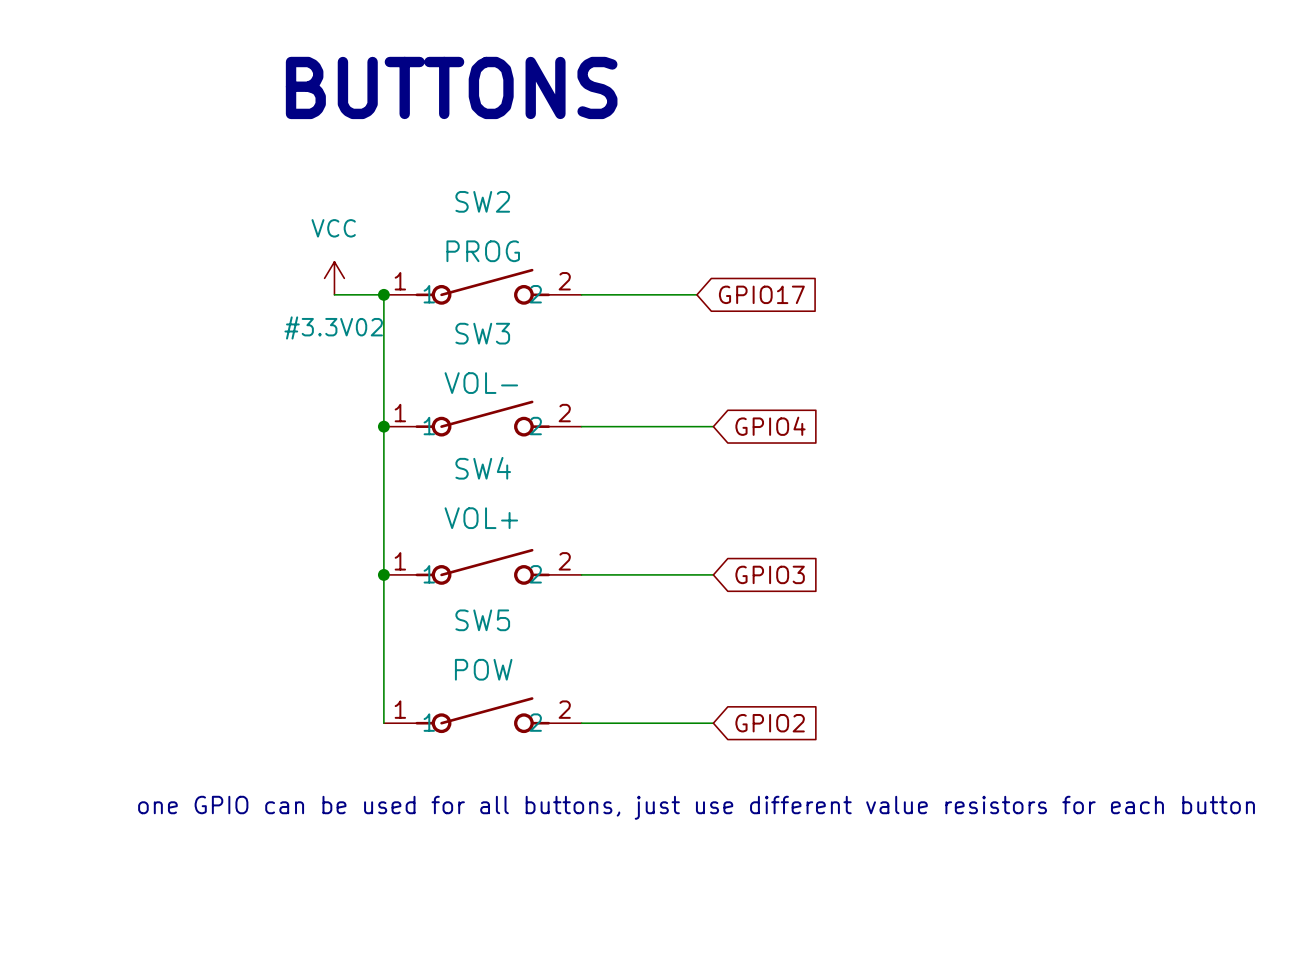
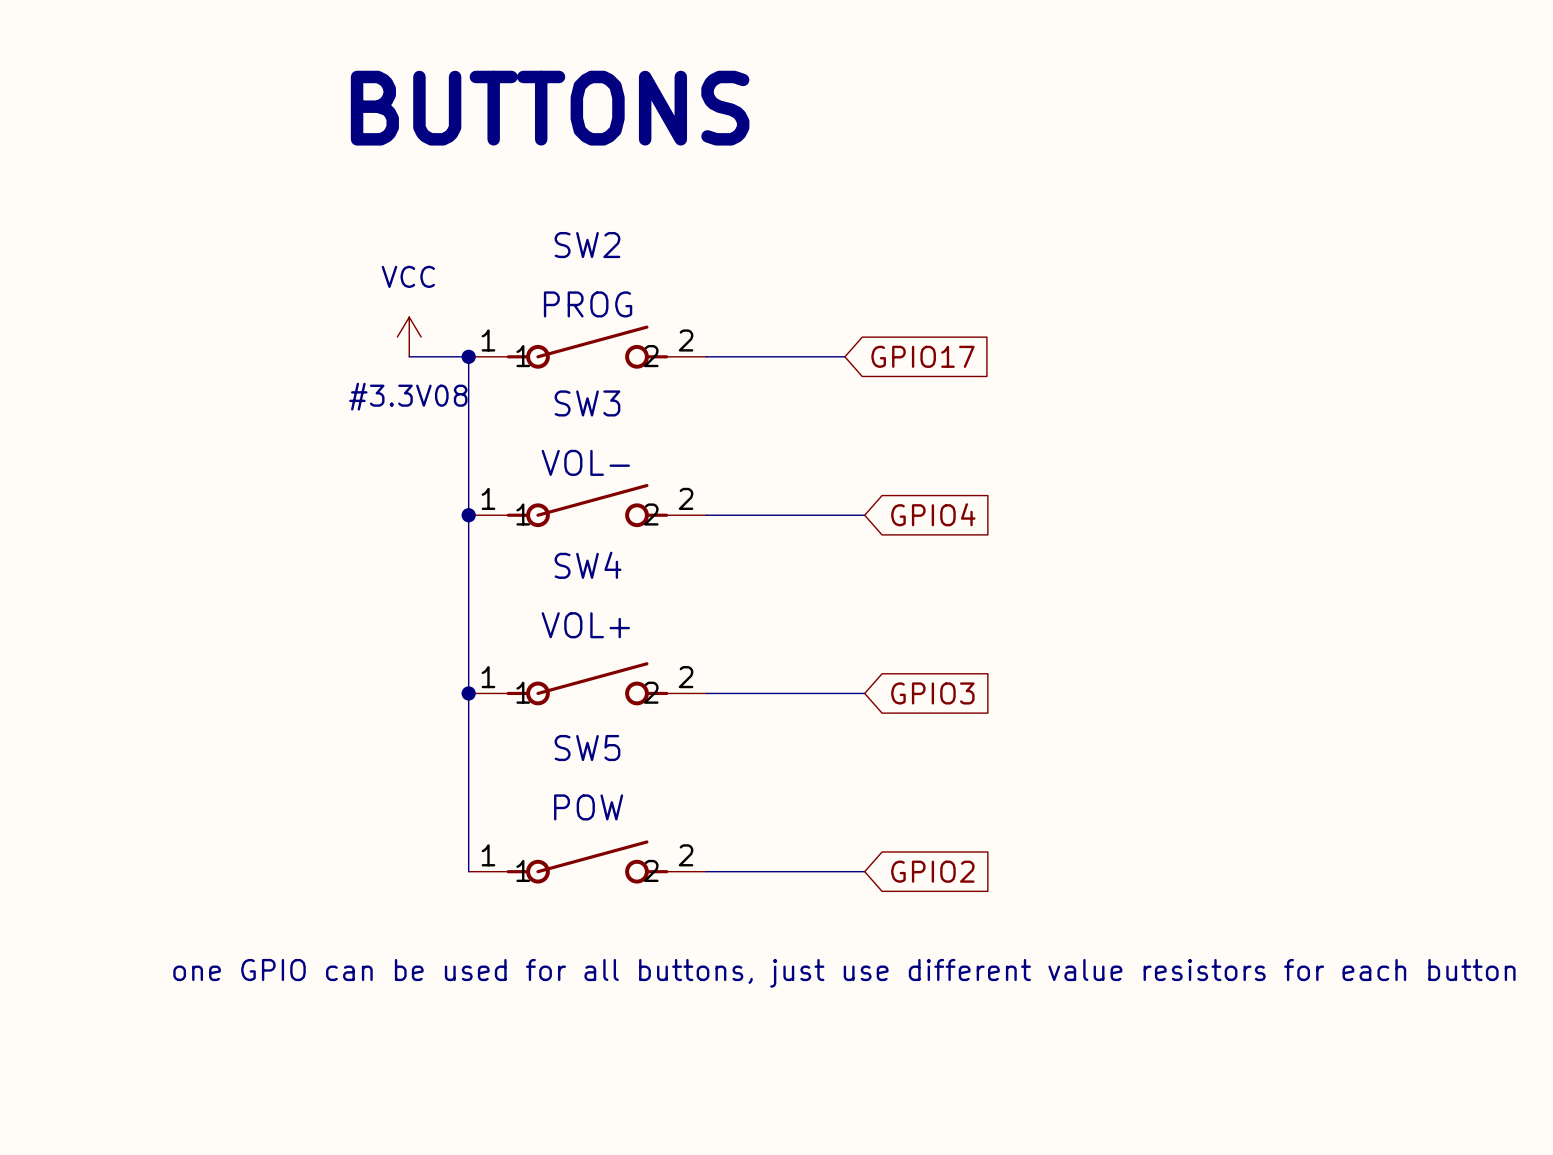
#3.3V02 name: #3.3V02 (333, 327) -> #3.3V08 (408, 396)

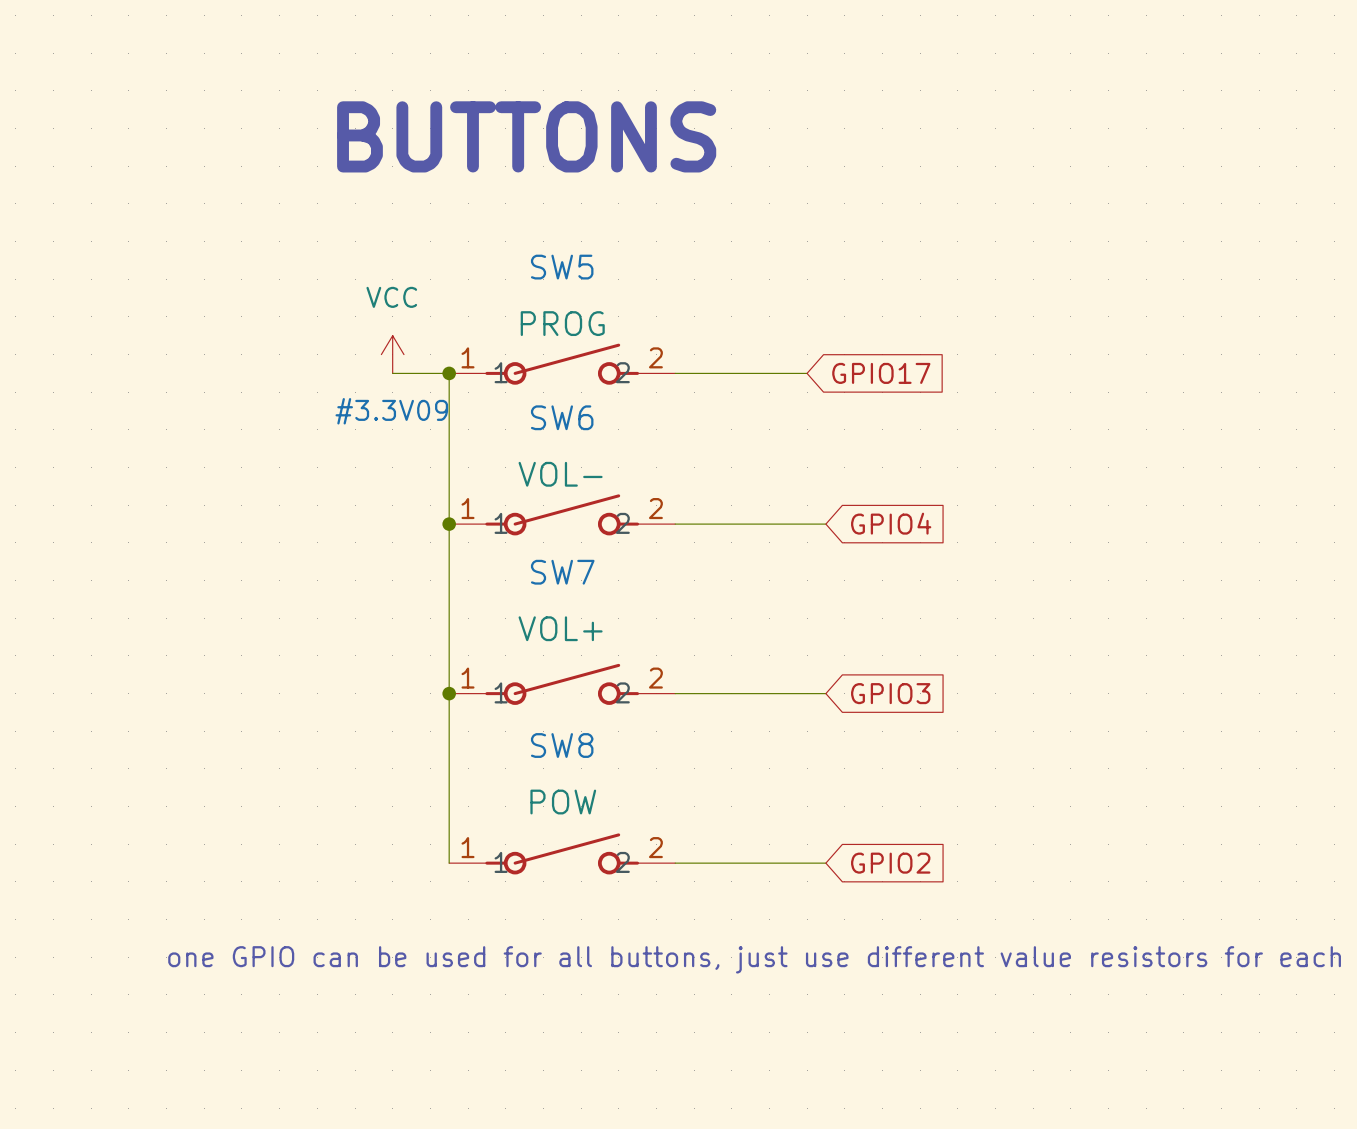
SW2 name: SW2 (587, 245) -> SW5 (562, 267)
#3.3V08 name: #3.3V08 (408, 396) -> #3.3V09 (391, 411)
SW3 name: SW3 (587, 403) -> SW6 (562, 417)
SW4 name: SW4 (588, 565) -> SW7 (562, 572)
SW5 name: SW5 (587, 748) -> SW8 (562, 745)

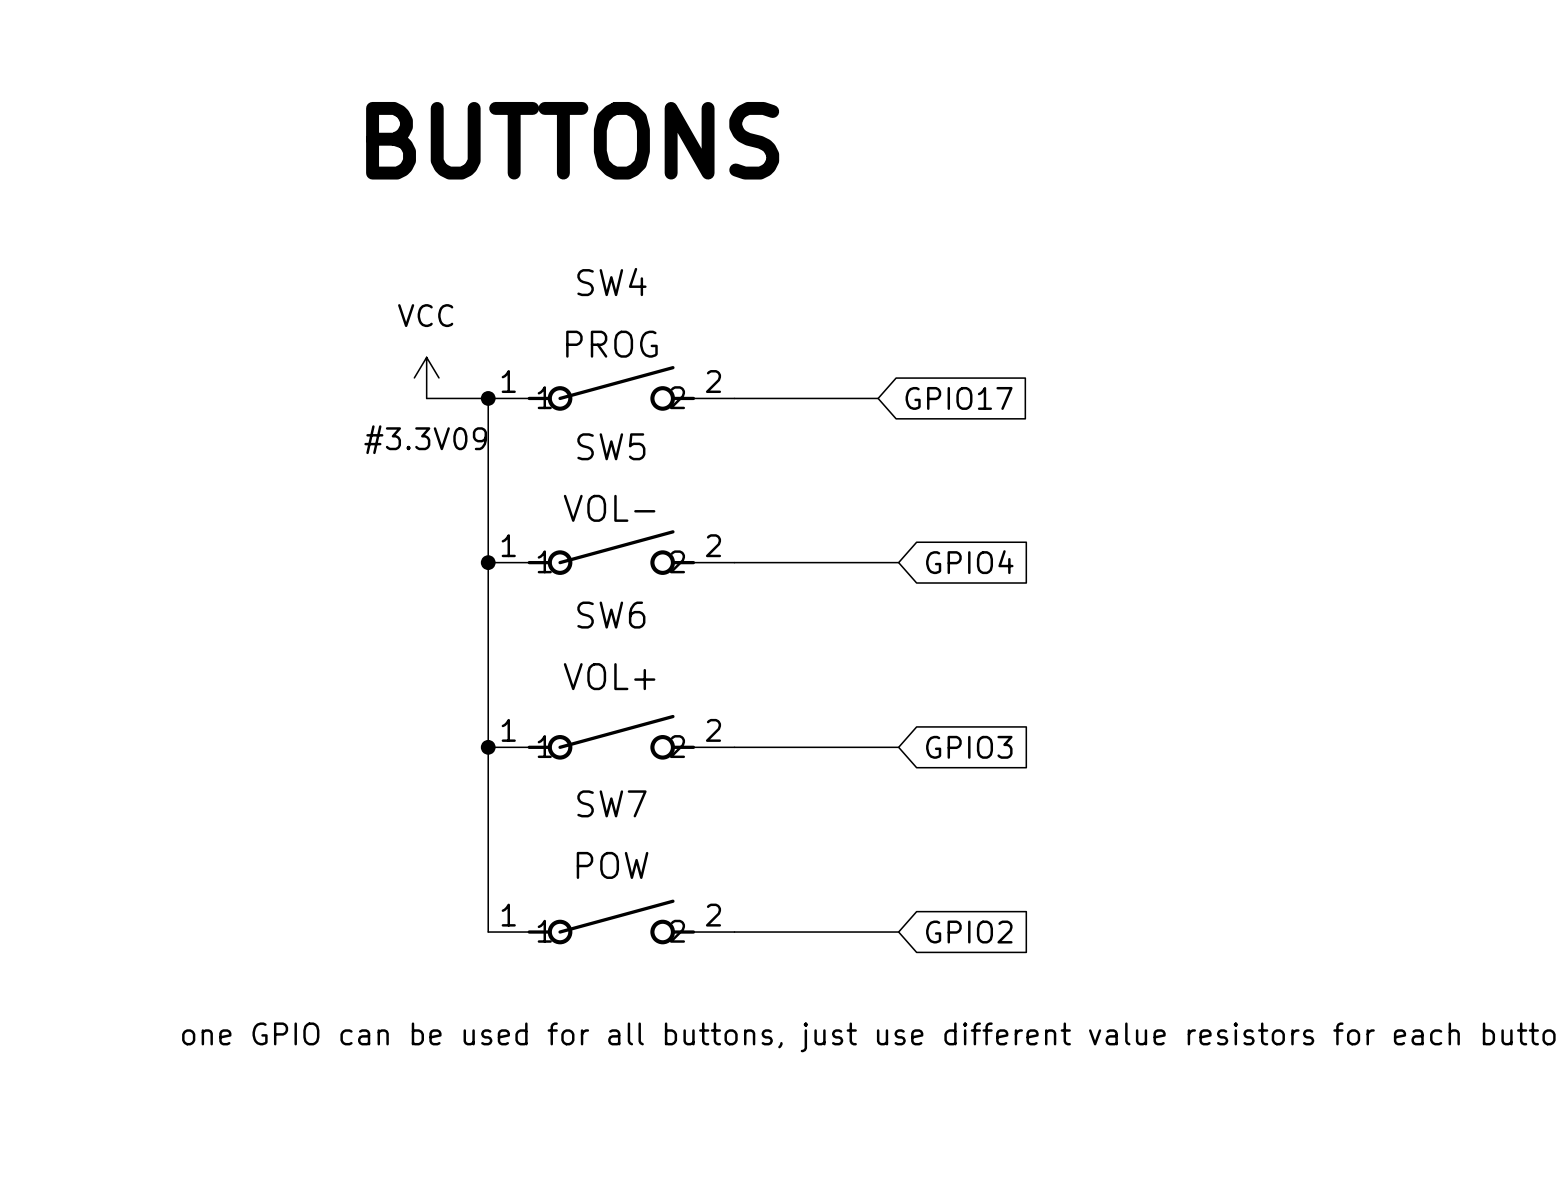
SW5 name: SW5 (562, 267) -> SW4 (611, 282)
SW6 name: SW6 (562, 417) -> SW5 (611, 446)
SW7 name: SW7 (562, 572) -> SW6 (611, 615)
SW8 name: SW8 (562, 745) -> SW7 (611, 803)

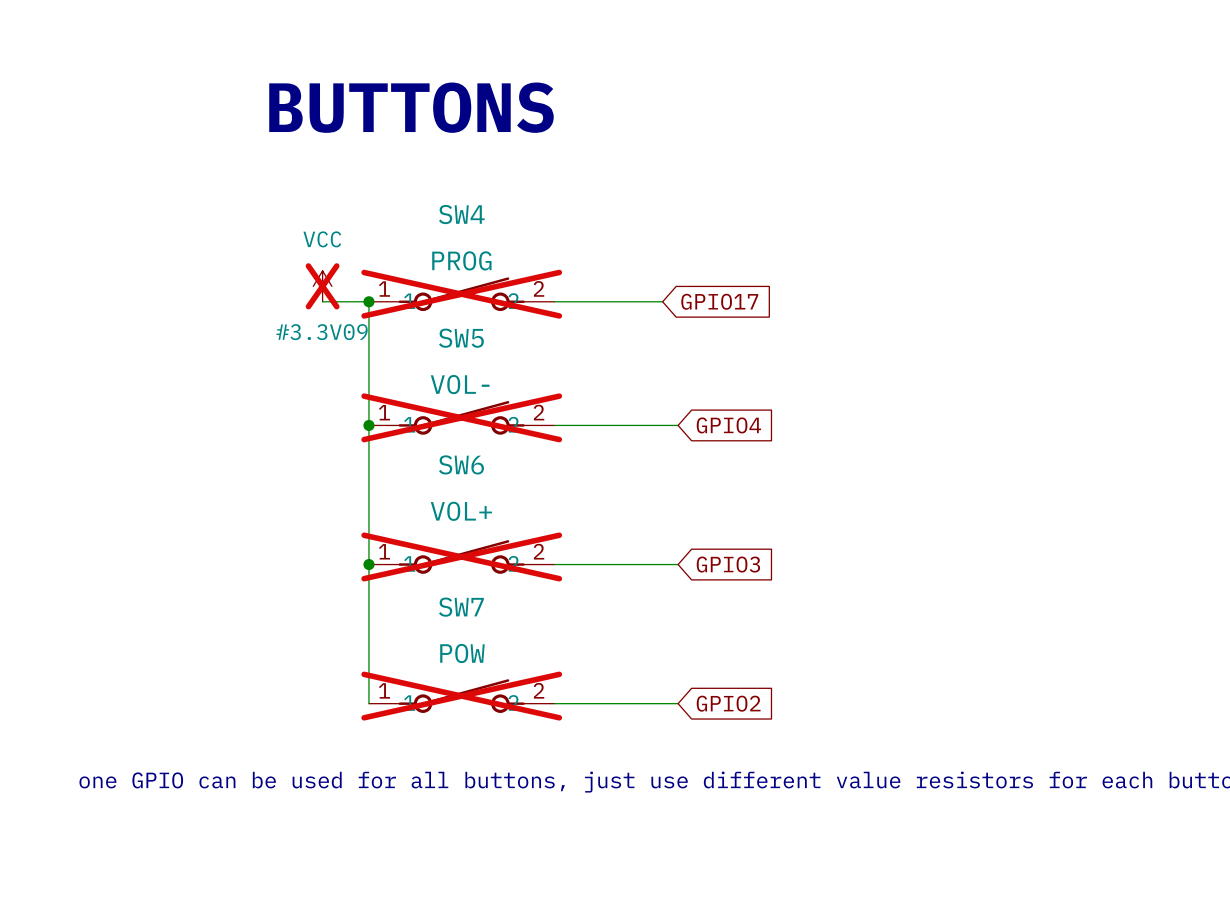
#3.3V09 do-not-place cross: none -> (322, 286)
SW4 do-not-place cross: none -> (461, 294)
SW5 do-not-place cross: none -> (461, 417)
SW6 do-not-place cross: none -> (461, 556)
SW7 do-not-place cross: none -> (461, 696)

